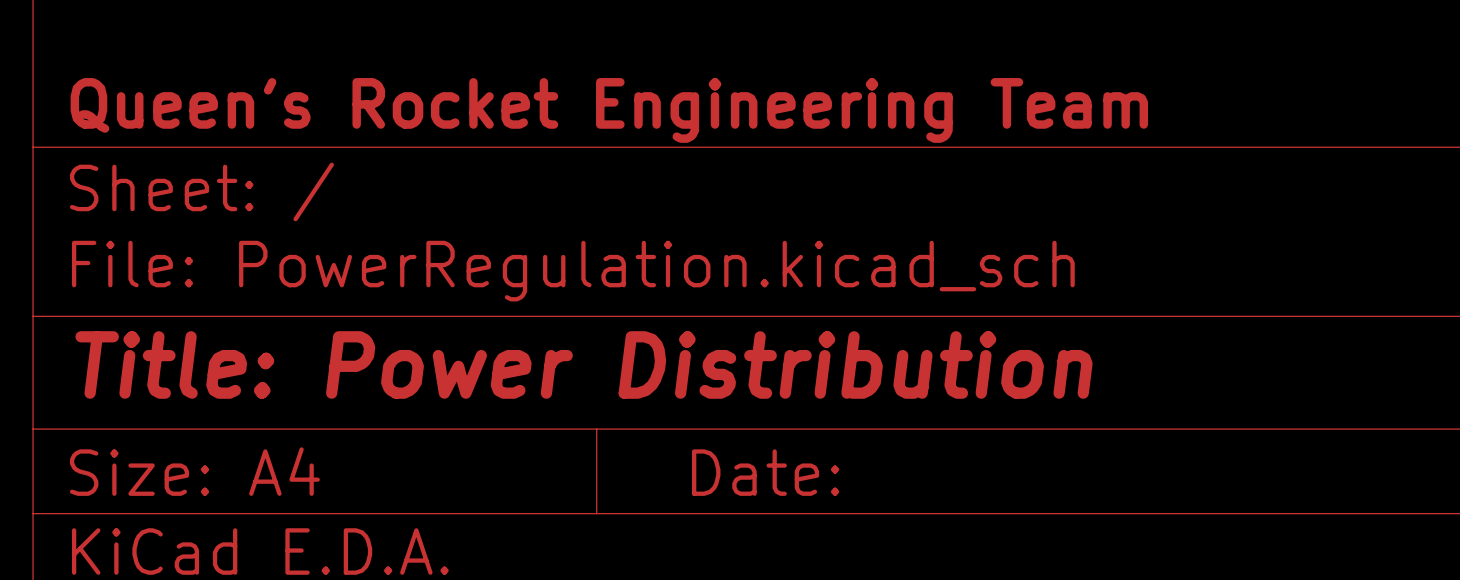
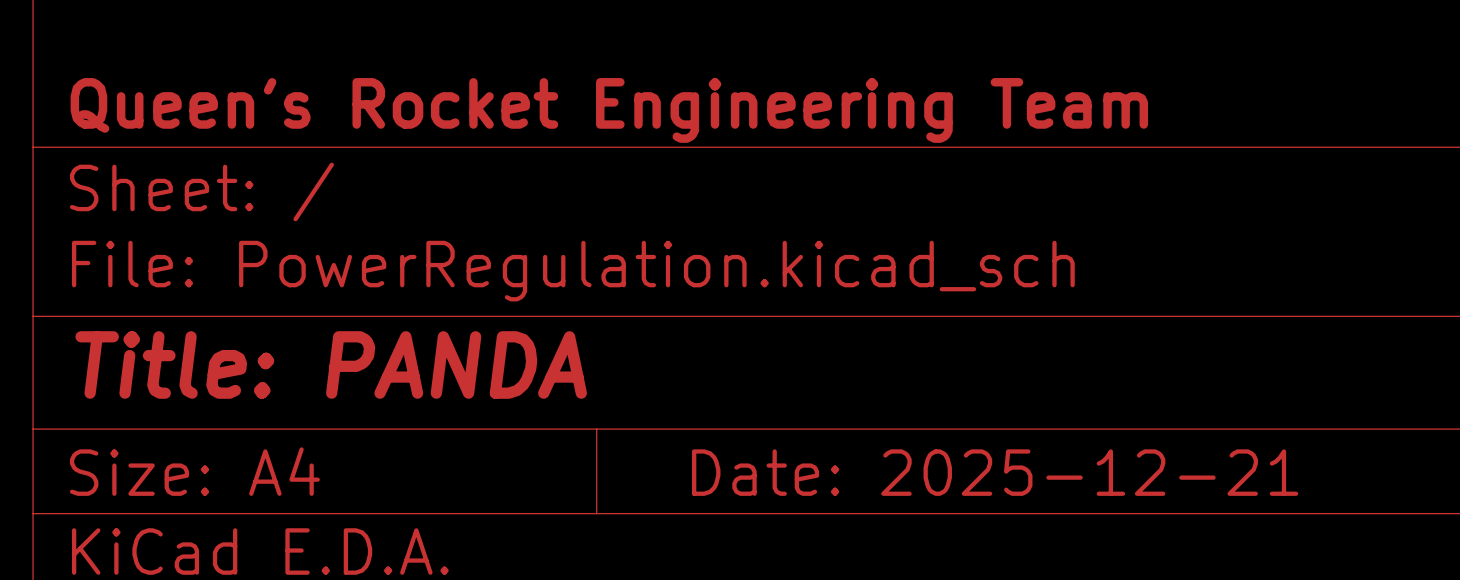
title block: Title: Power Distribution (584, 364) -> Title: PANDA (331, 364)
title block: Date: (765, 472) -> Date: 2025-12-21 (995, 472)

